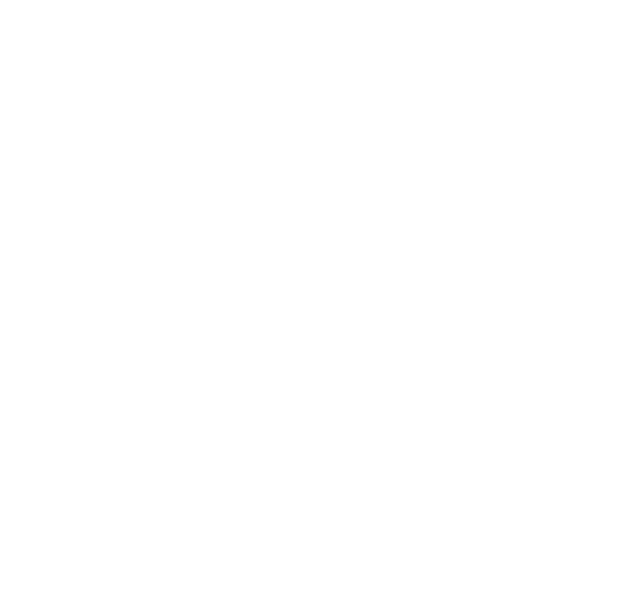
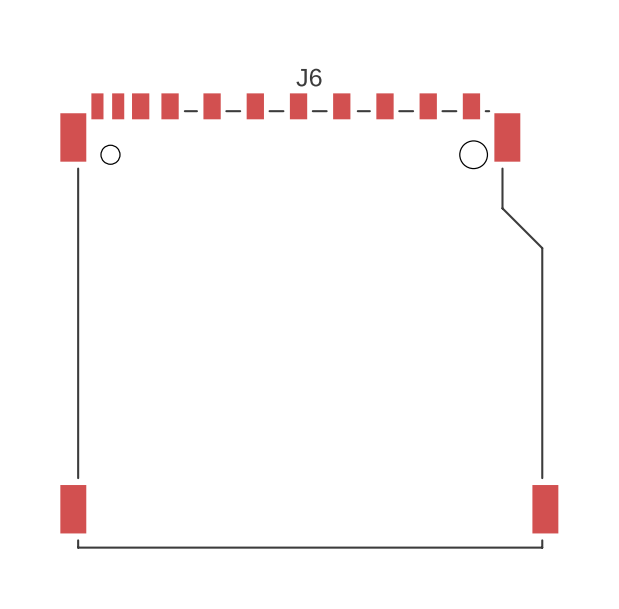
J6: none -> (309, 321)

